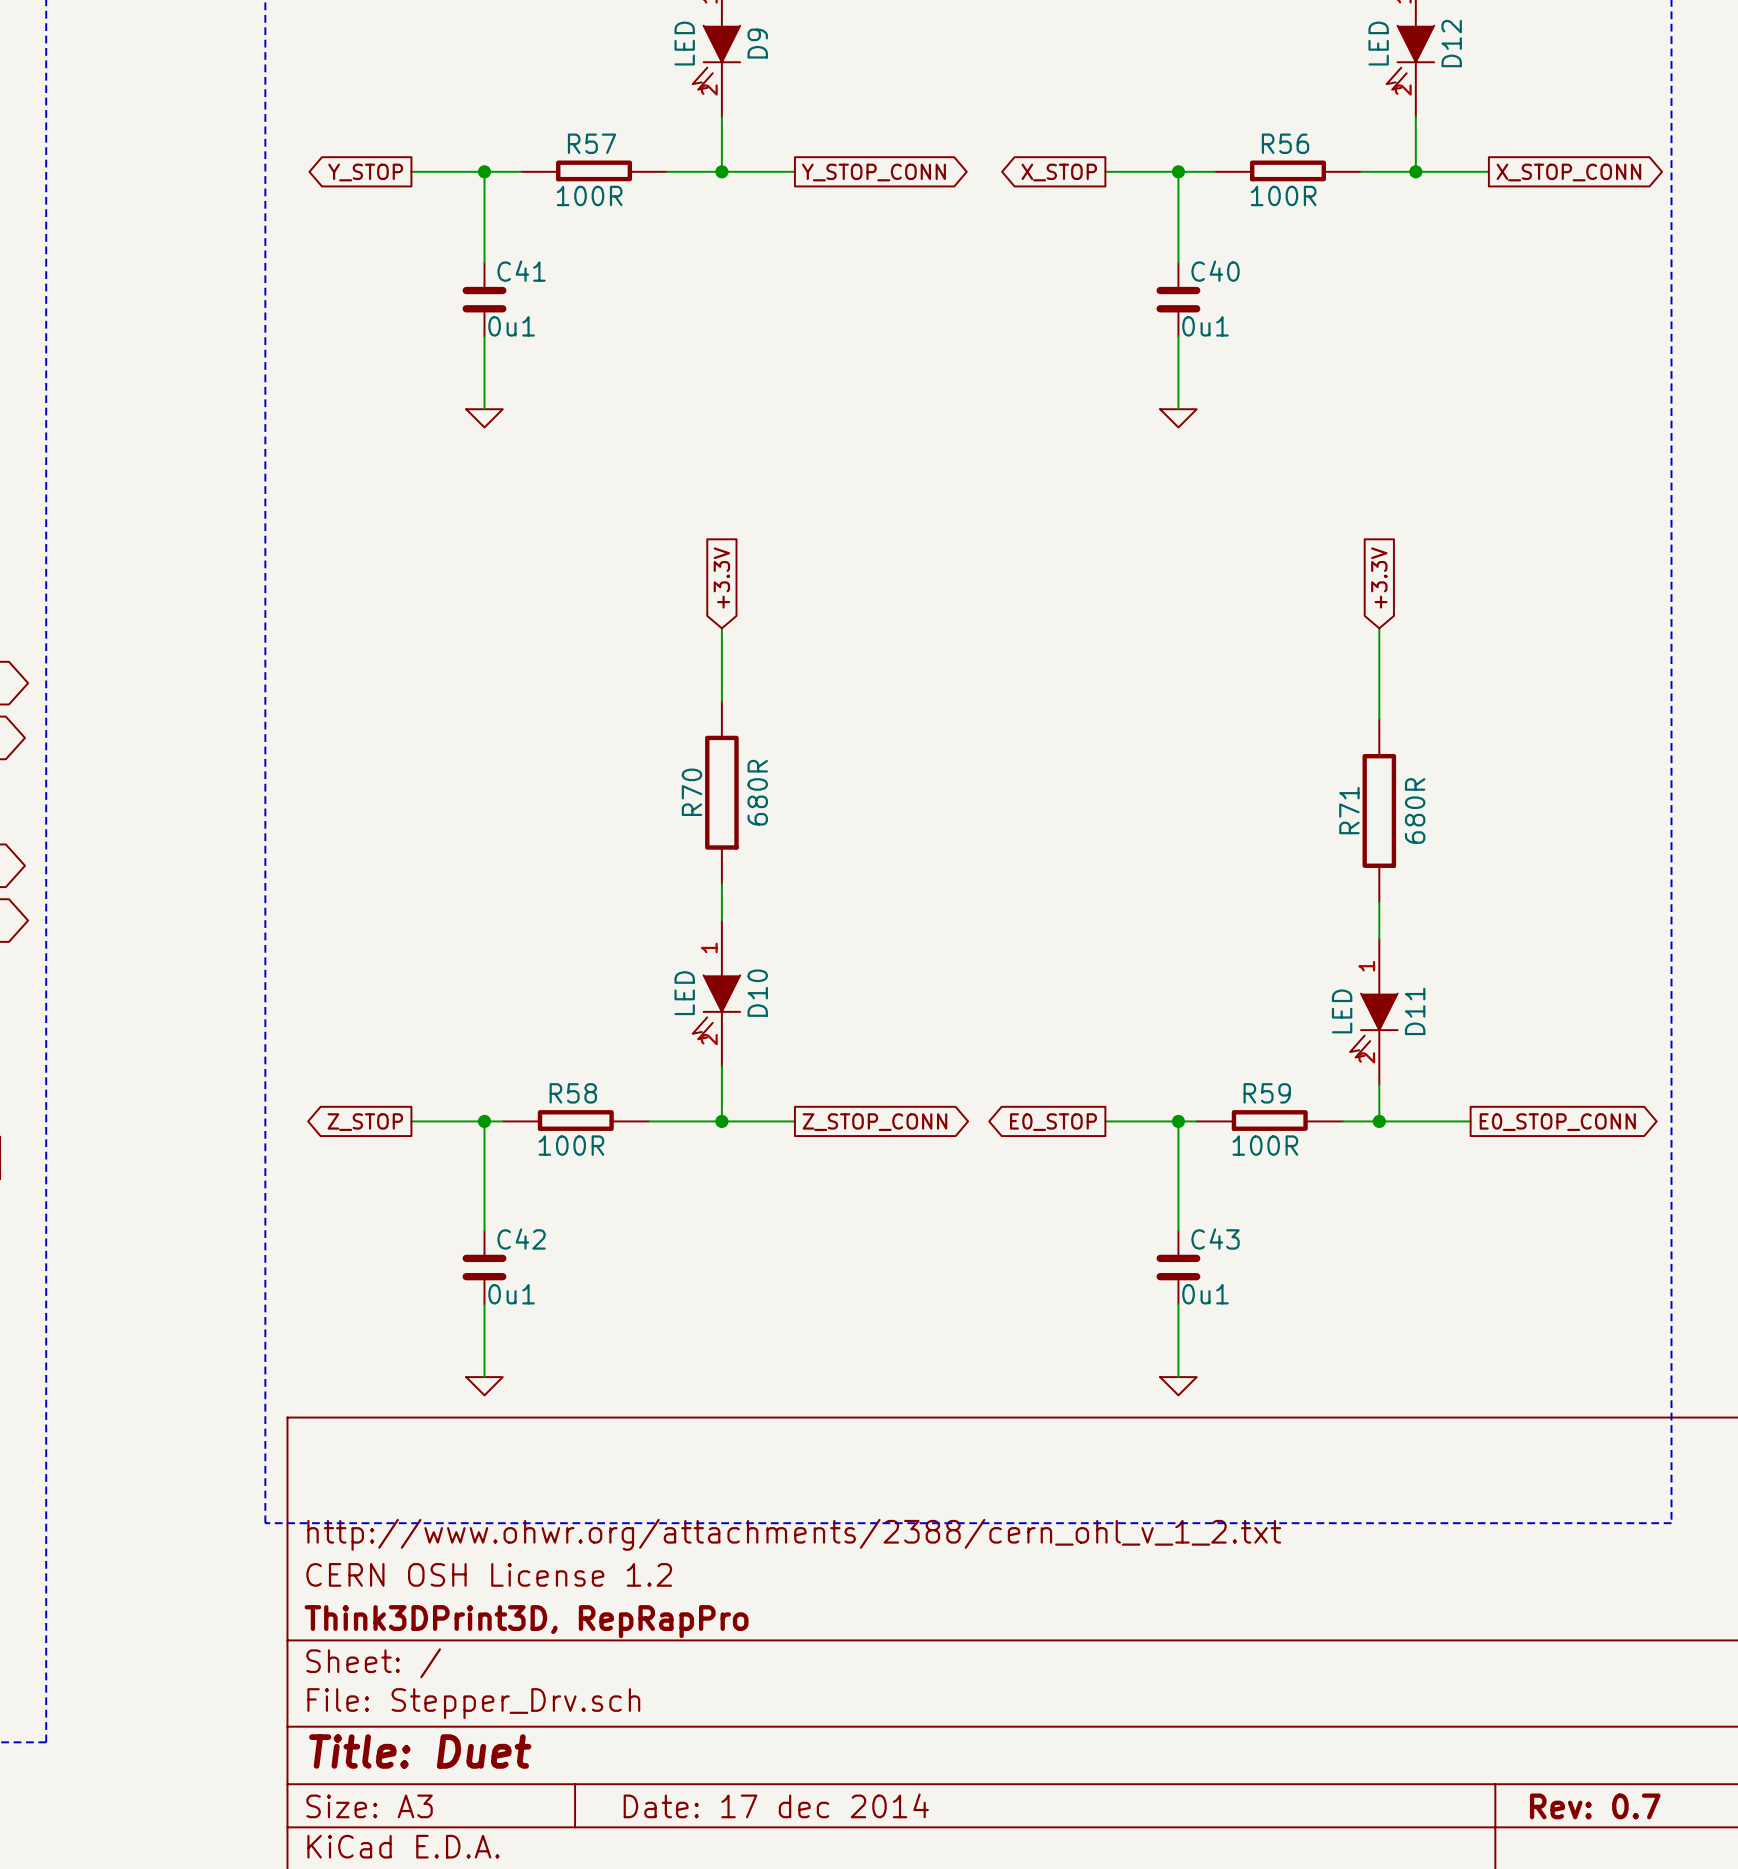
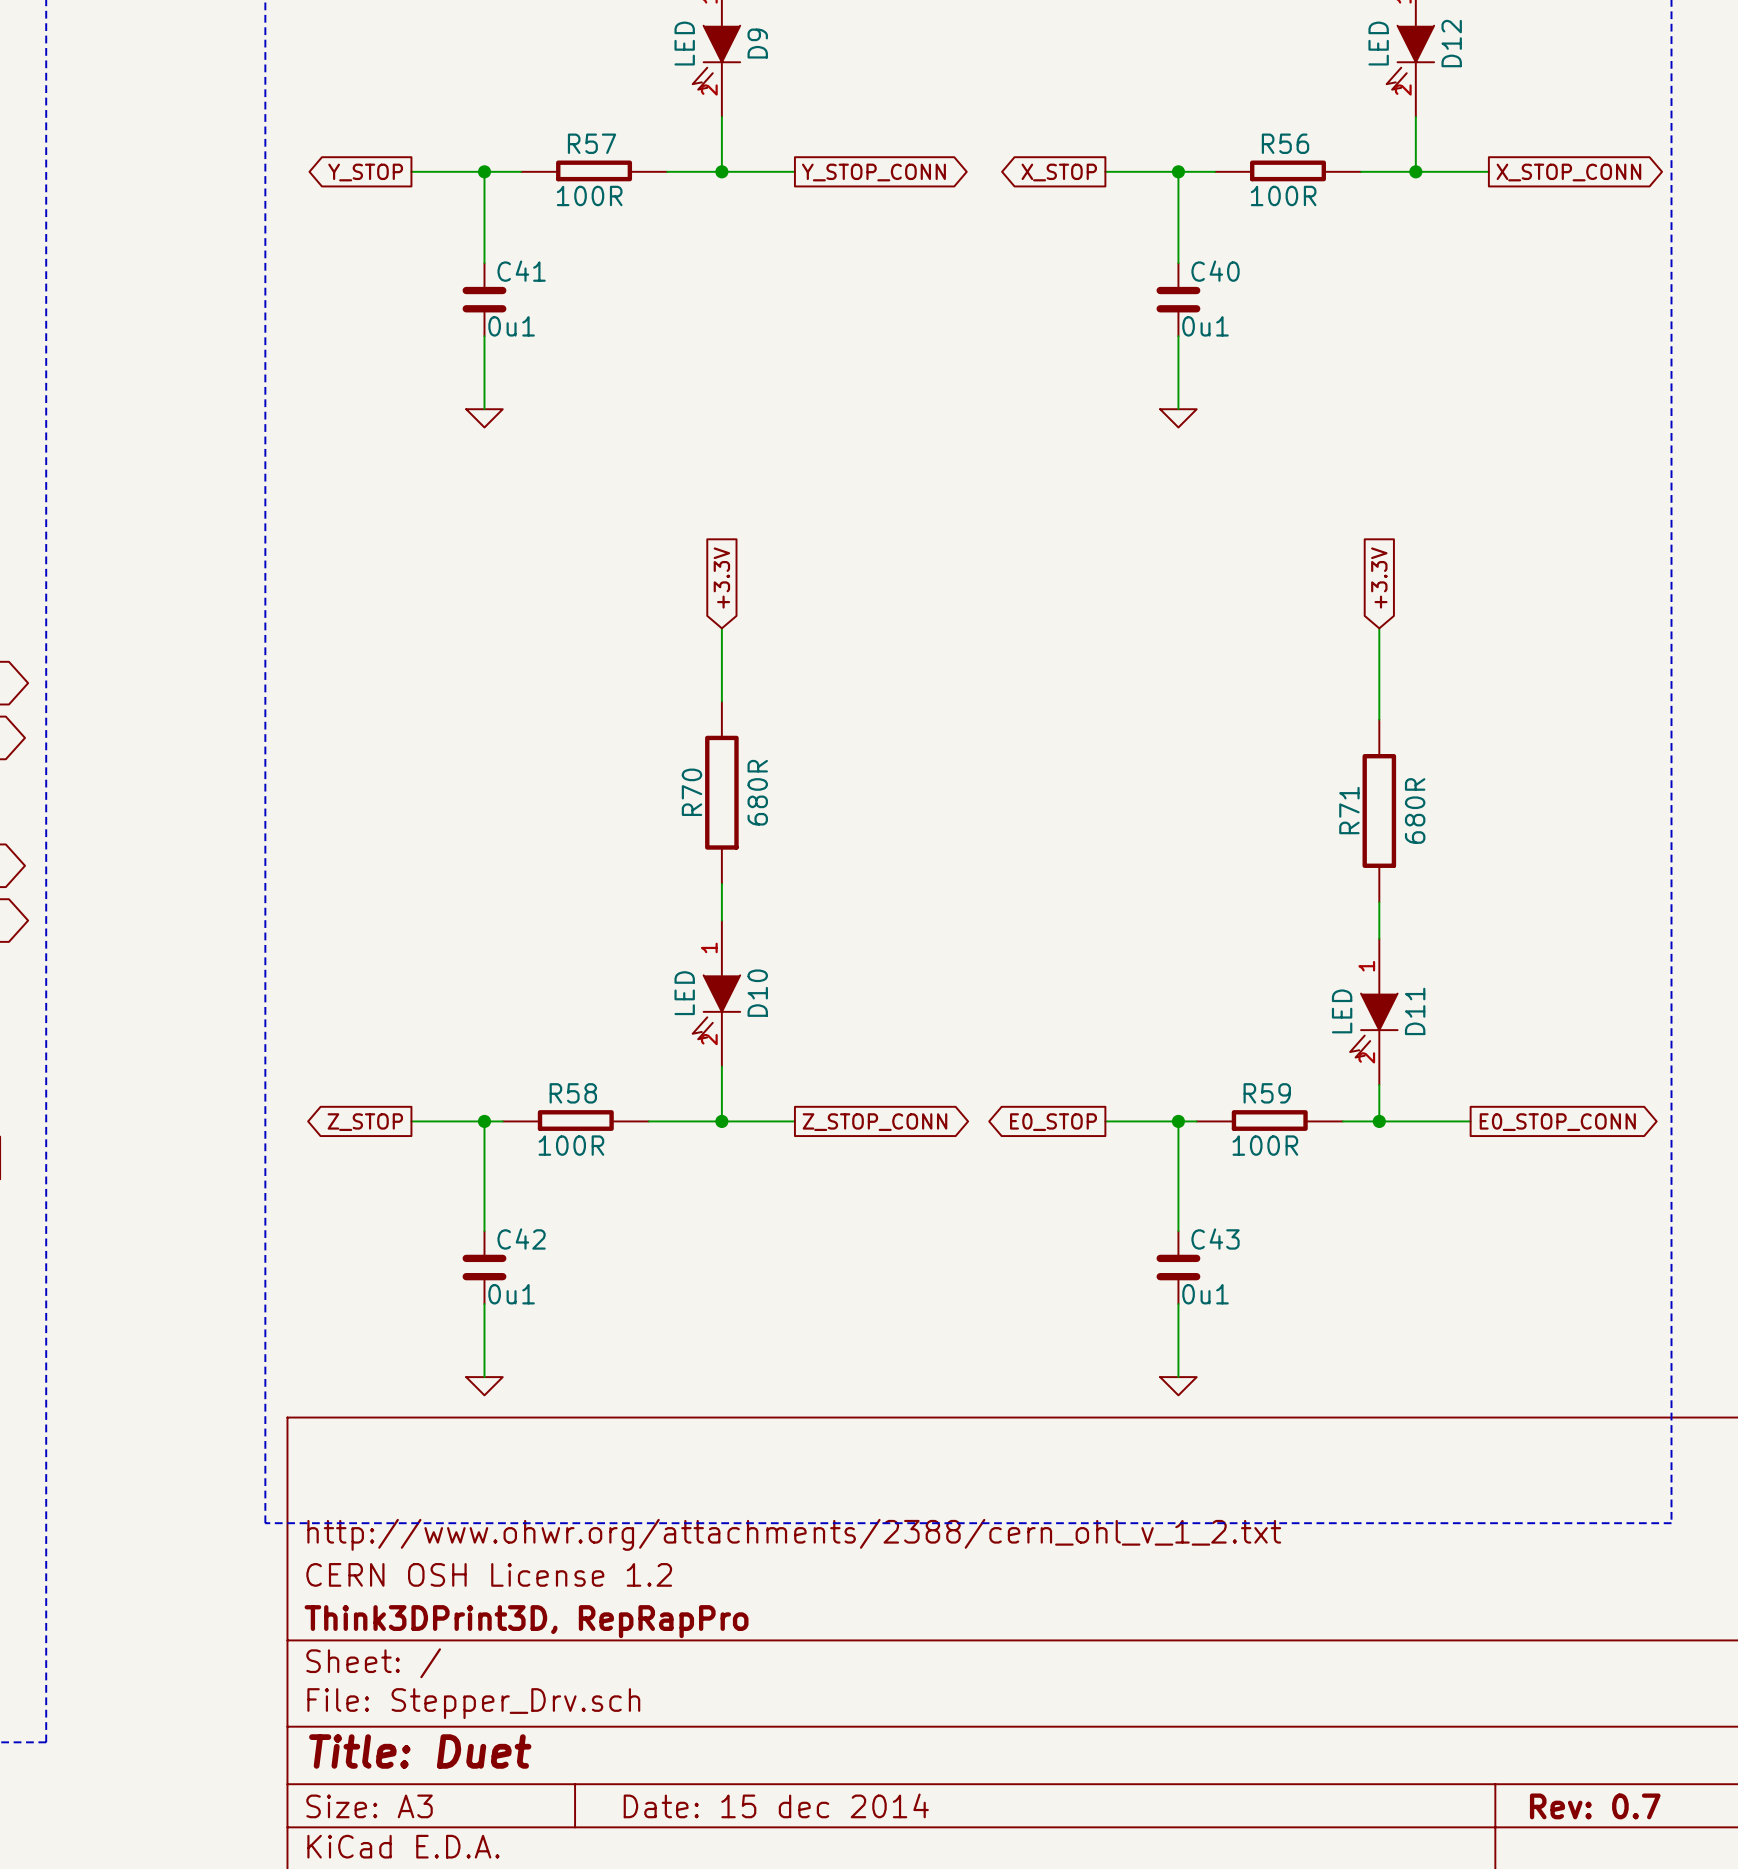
title block: Date: 17 dec 2014 (776, 1805) -> Date: 15 dec 2014 (776, 1805)

